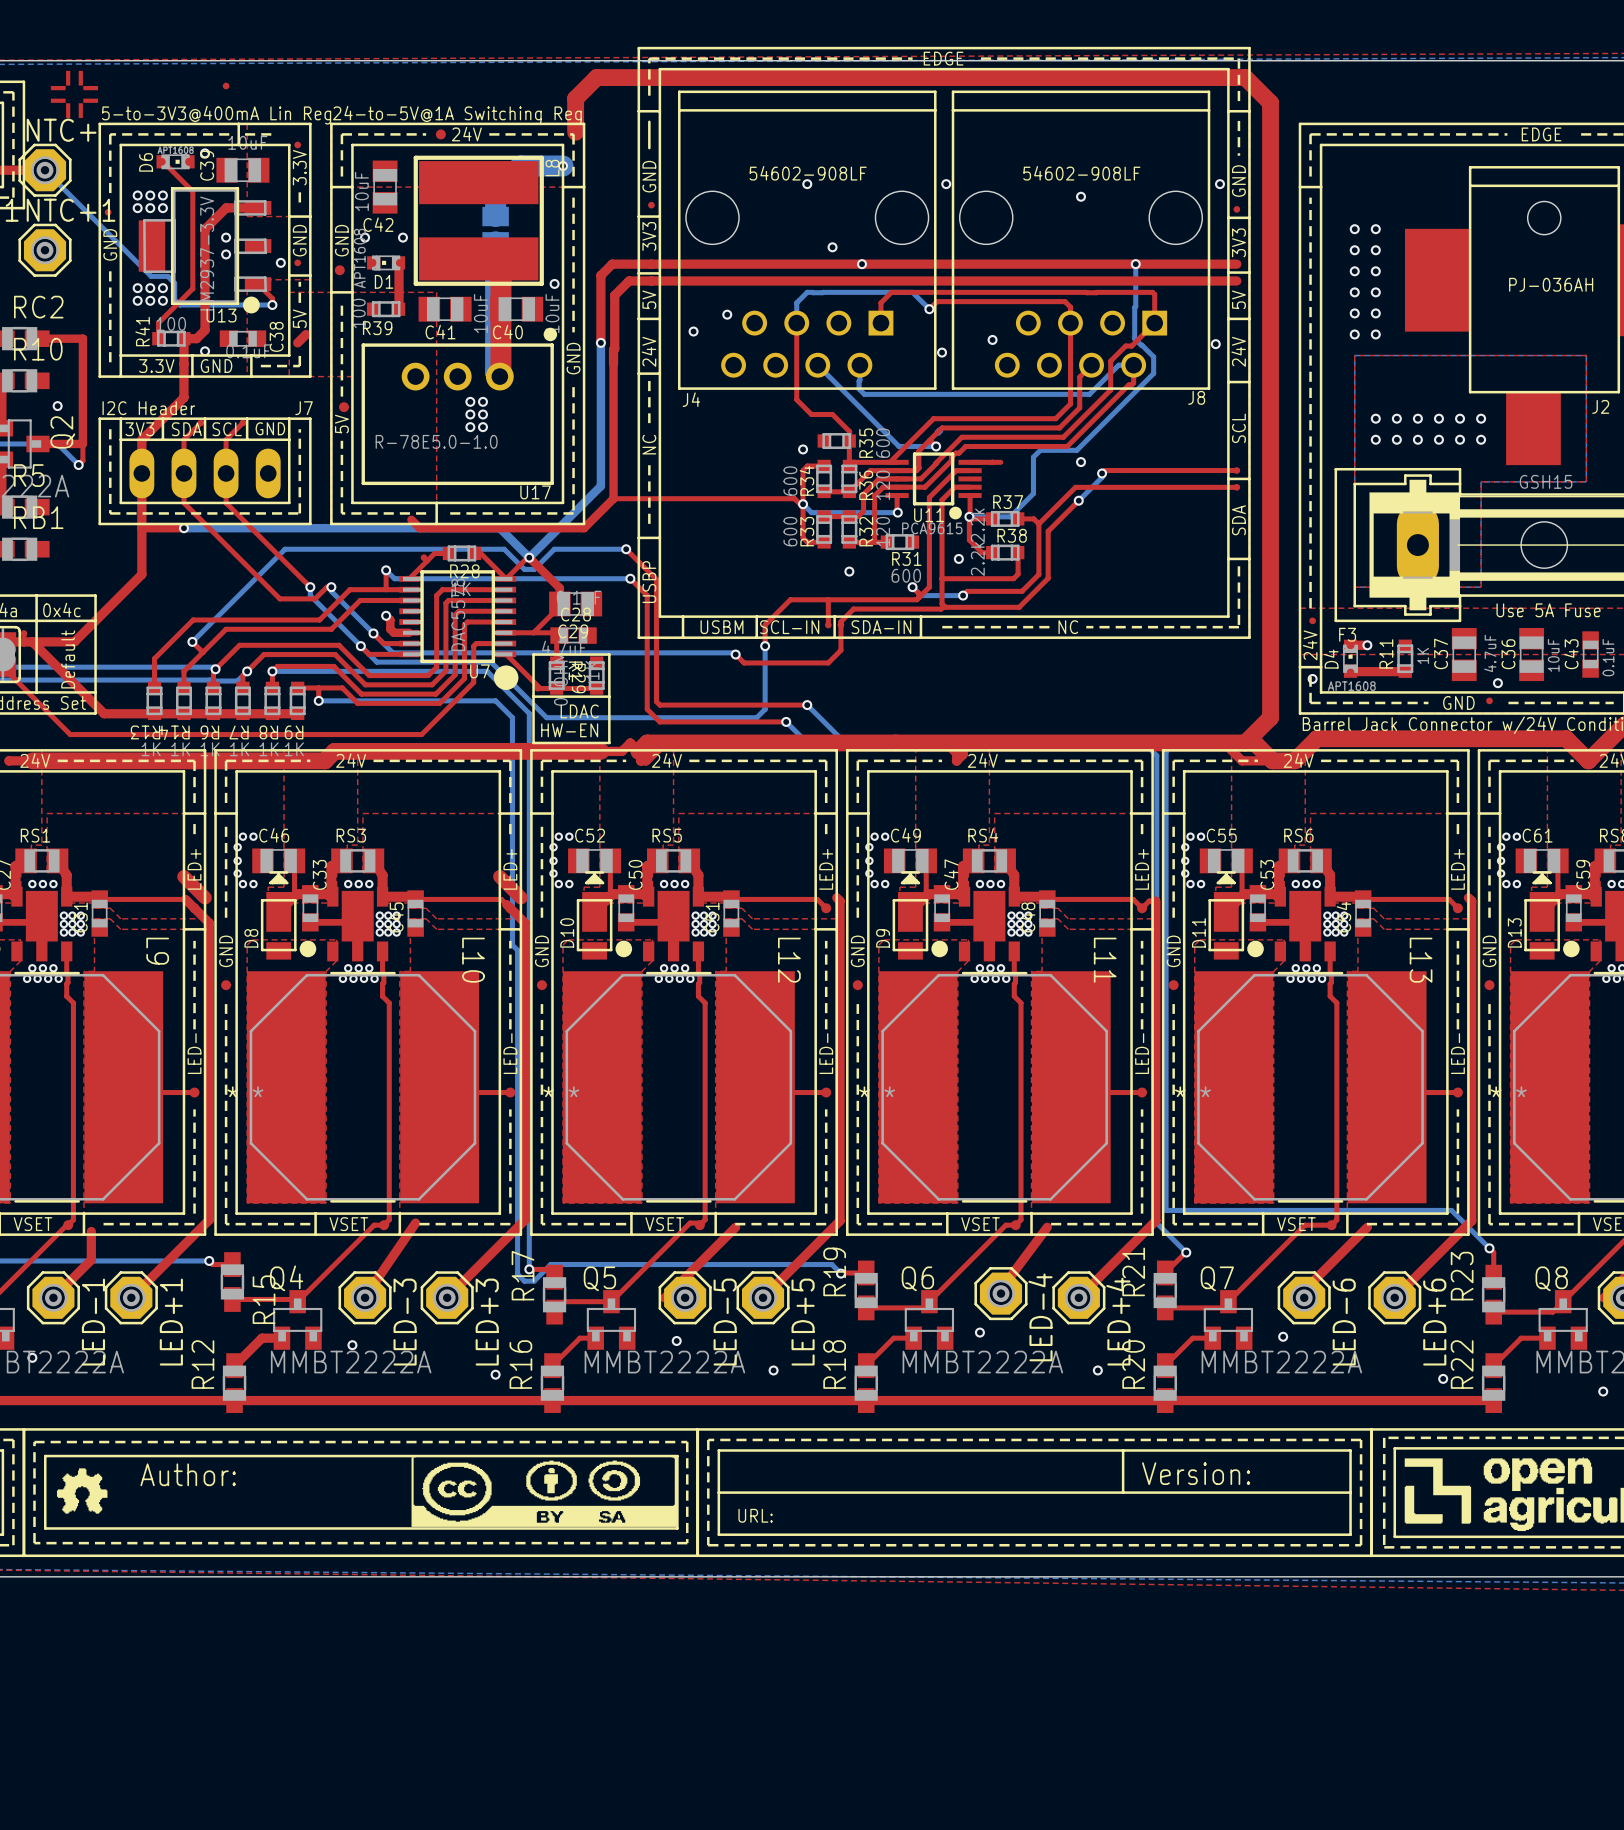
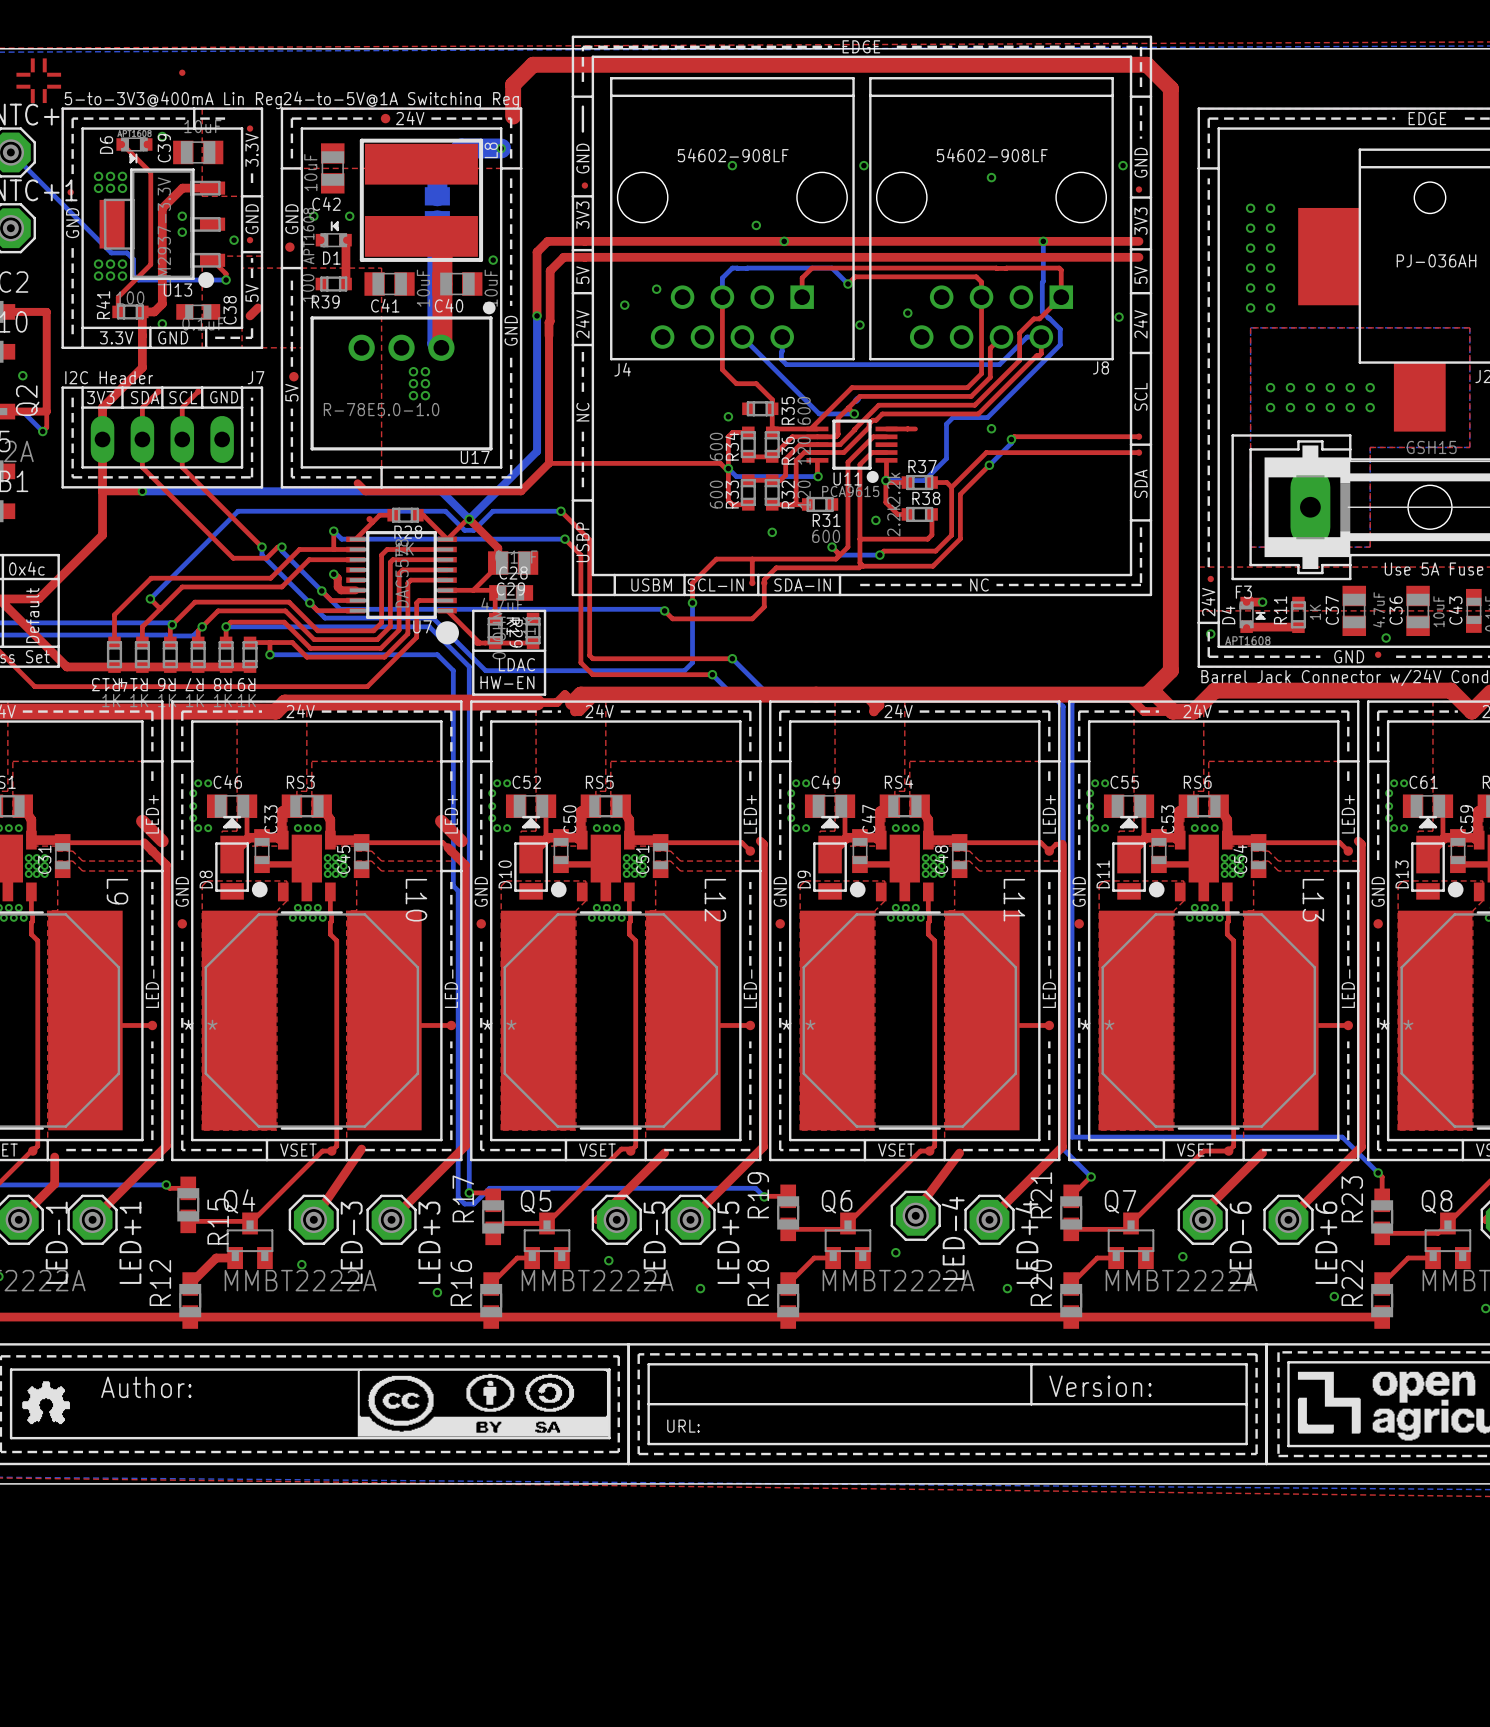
D6 footprint: [156, 154, 195, 170] -> [116, 137, 153, 164]
D1 footprint: [367, 255, 406, 271] -> [315, 221, 352, 248]
D4 footprint: [1343, 639, 1359, 678] -> [1239, 596, 1266, 633]

